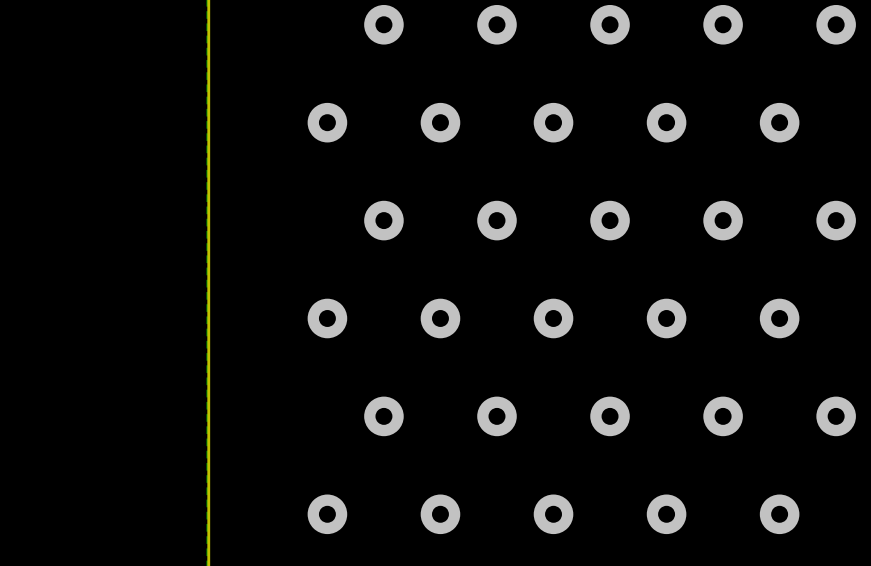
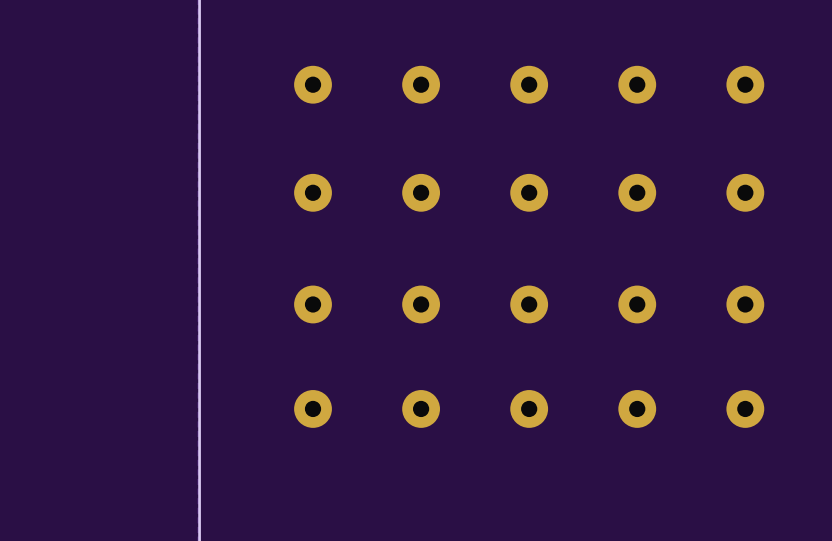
via: (383, 24) -> none
via: (496, 24) -> none
via: (610, 24) -> none
via: (723, 24) -> none
via: (836, 24) -> none
via position: (327, 122) -> (313, 84)
via position: (440, 122) -> (421, 84)
via position: (553, 122) -> (529, 84)
via position: (666, 122) -> (637, 84)
via position: (779, 122) -> (745, 84)
via: none -> (313, 192)
via: none -> (421, 192)
via: none -> (529, 192)
via: none -> (637, 192)
via: none -> (745, 192)
via: (383, 220) -> none
via: (496, 220) -> none
via: (610, 220) -> none
via: (723, 220) -> none
via: (836, 220) -> none
via: (383, 416) -> none
via: (496, 416) -> none
via: (610, 416) -> none
via: (723, 416) -> none
via: (836, 416) -> none
via: none -> (313, 408)
via: none -> (421, 408)
via: none -> (529, 408)
via: none -> (637, 408)
via: none -> (745, 408)
via: (327, 514) -> none
via: (440, 514) -> none
via: (553, 514) -> none
via: (666, 514) -> none
via: (779, 514) -> none

